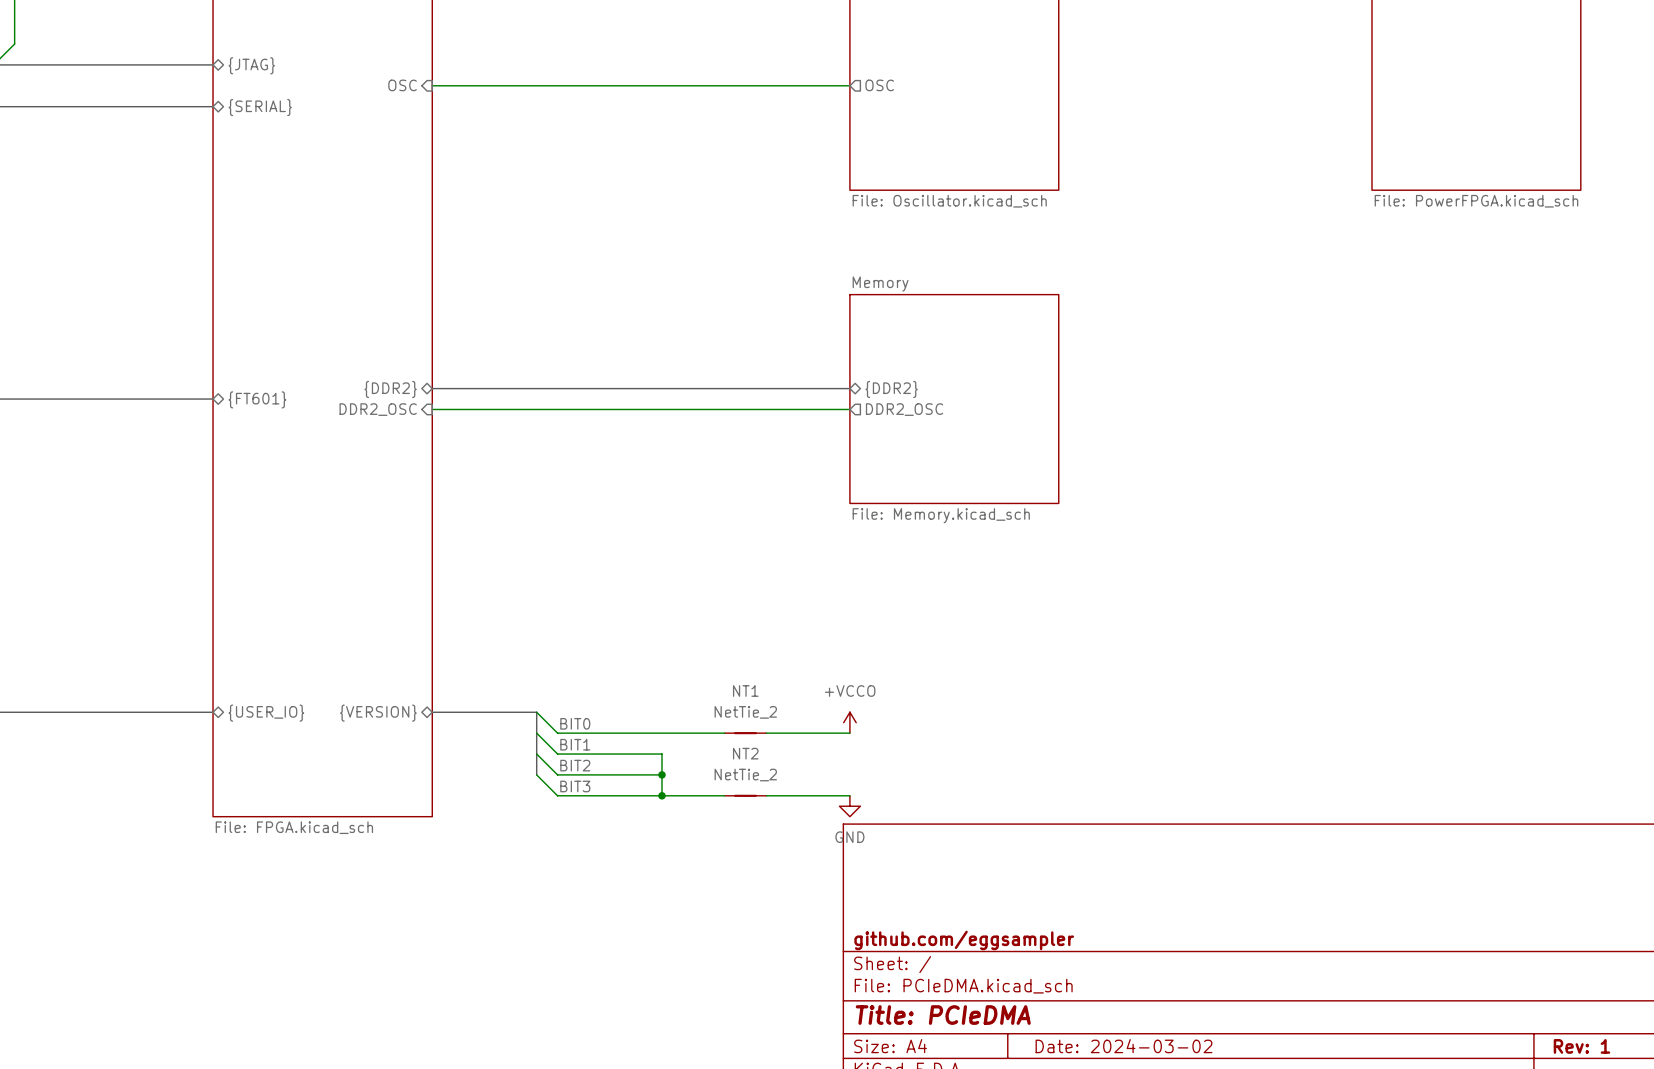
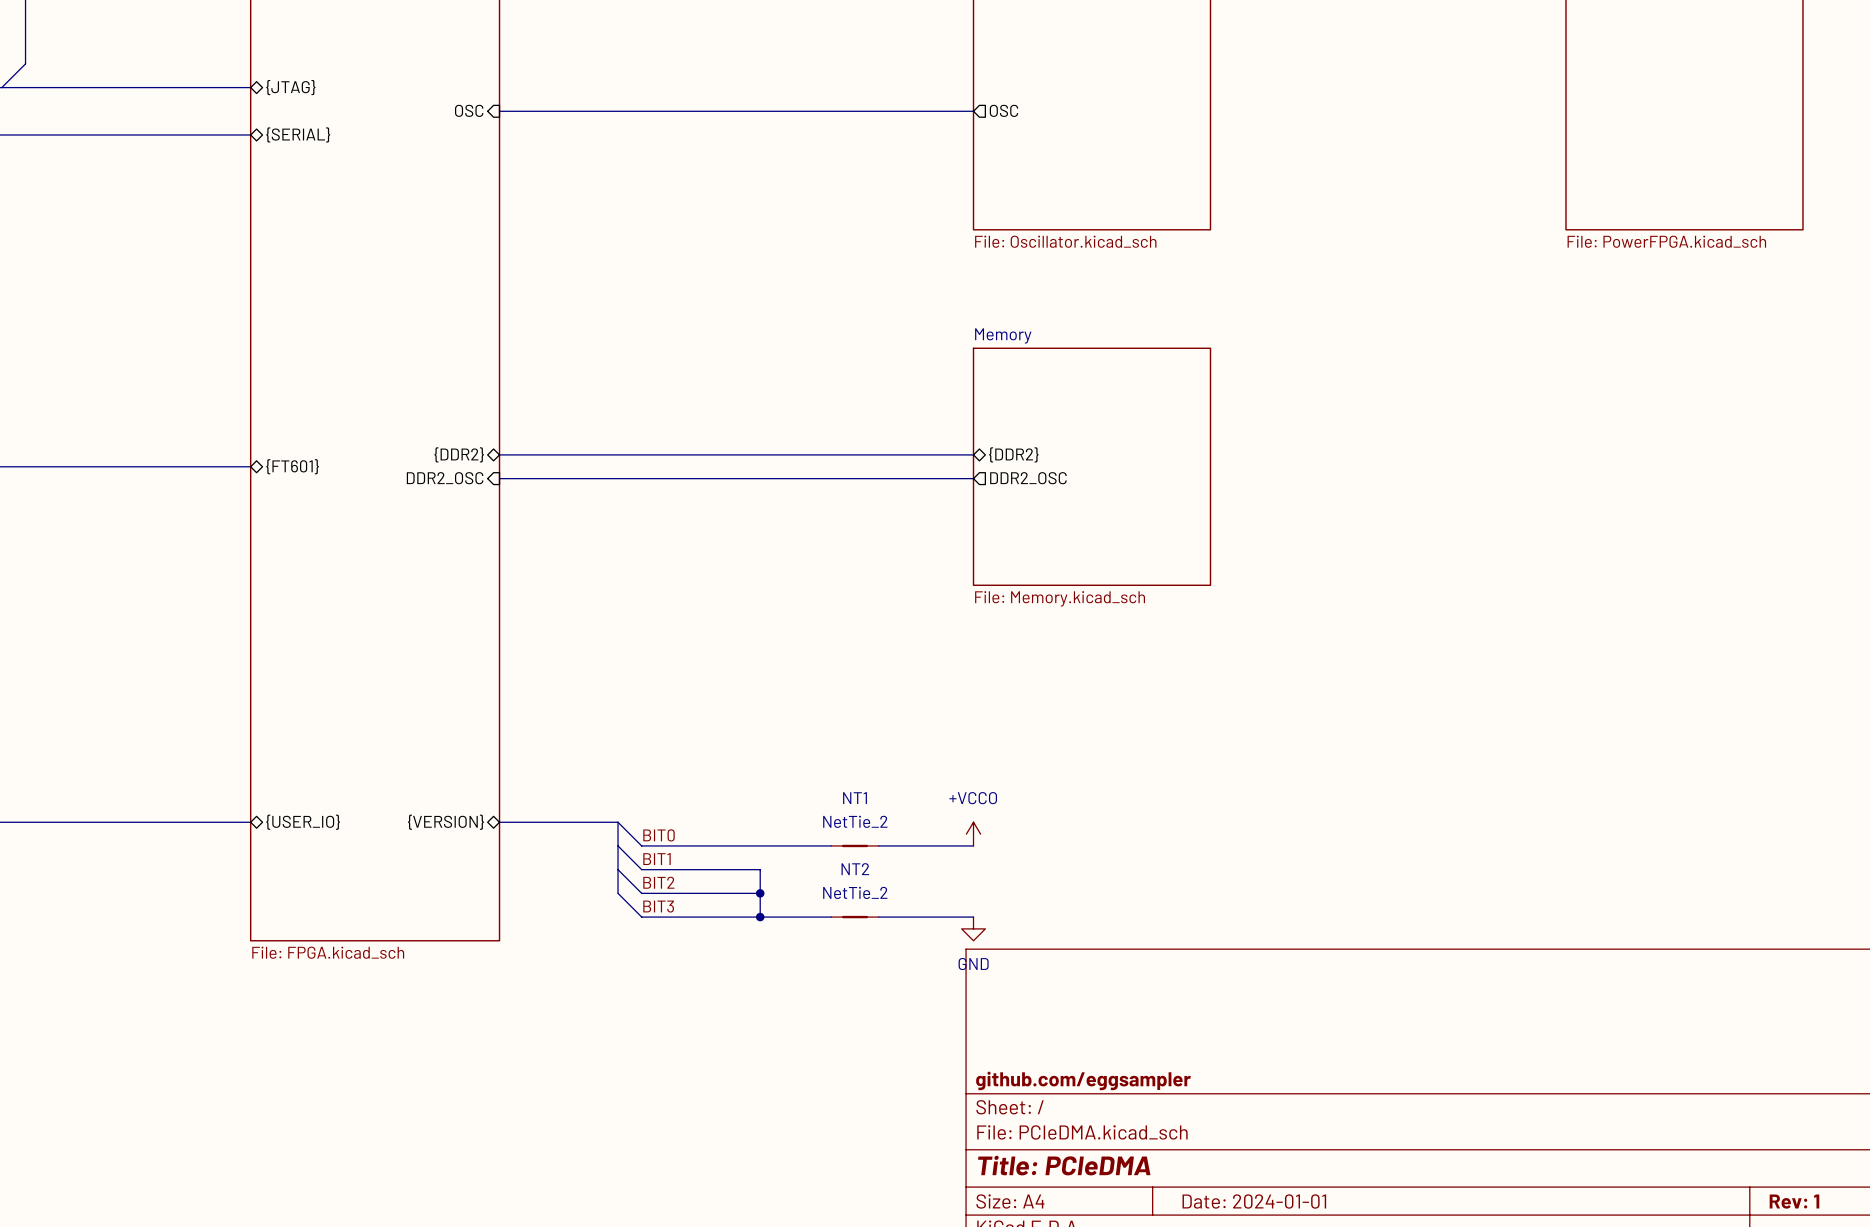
title block: Date: 2024-03-02 (1124, 1046) -> Date: 2024-01-01 (1254, 1201)

